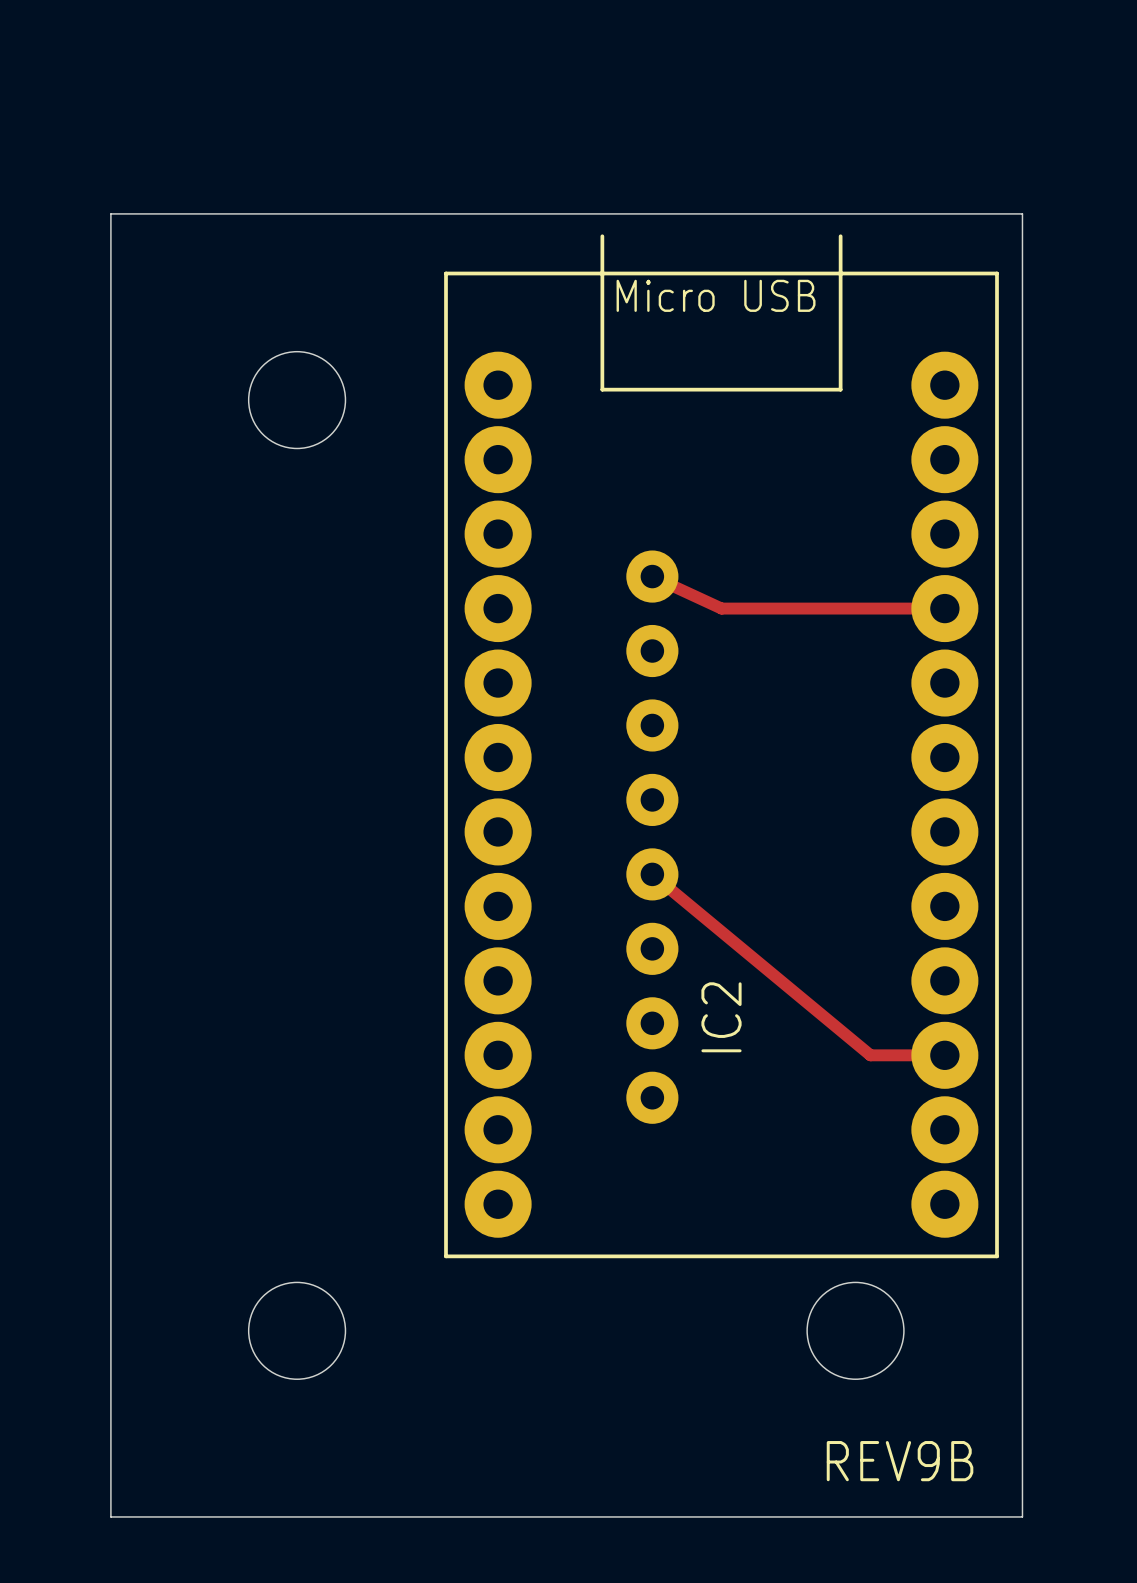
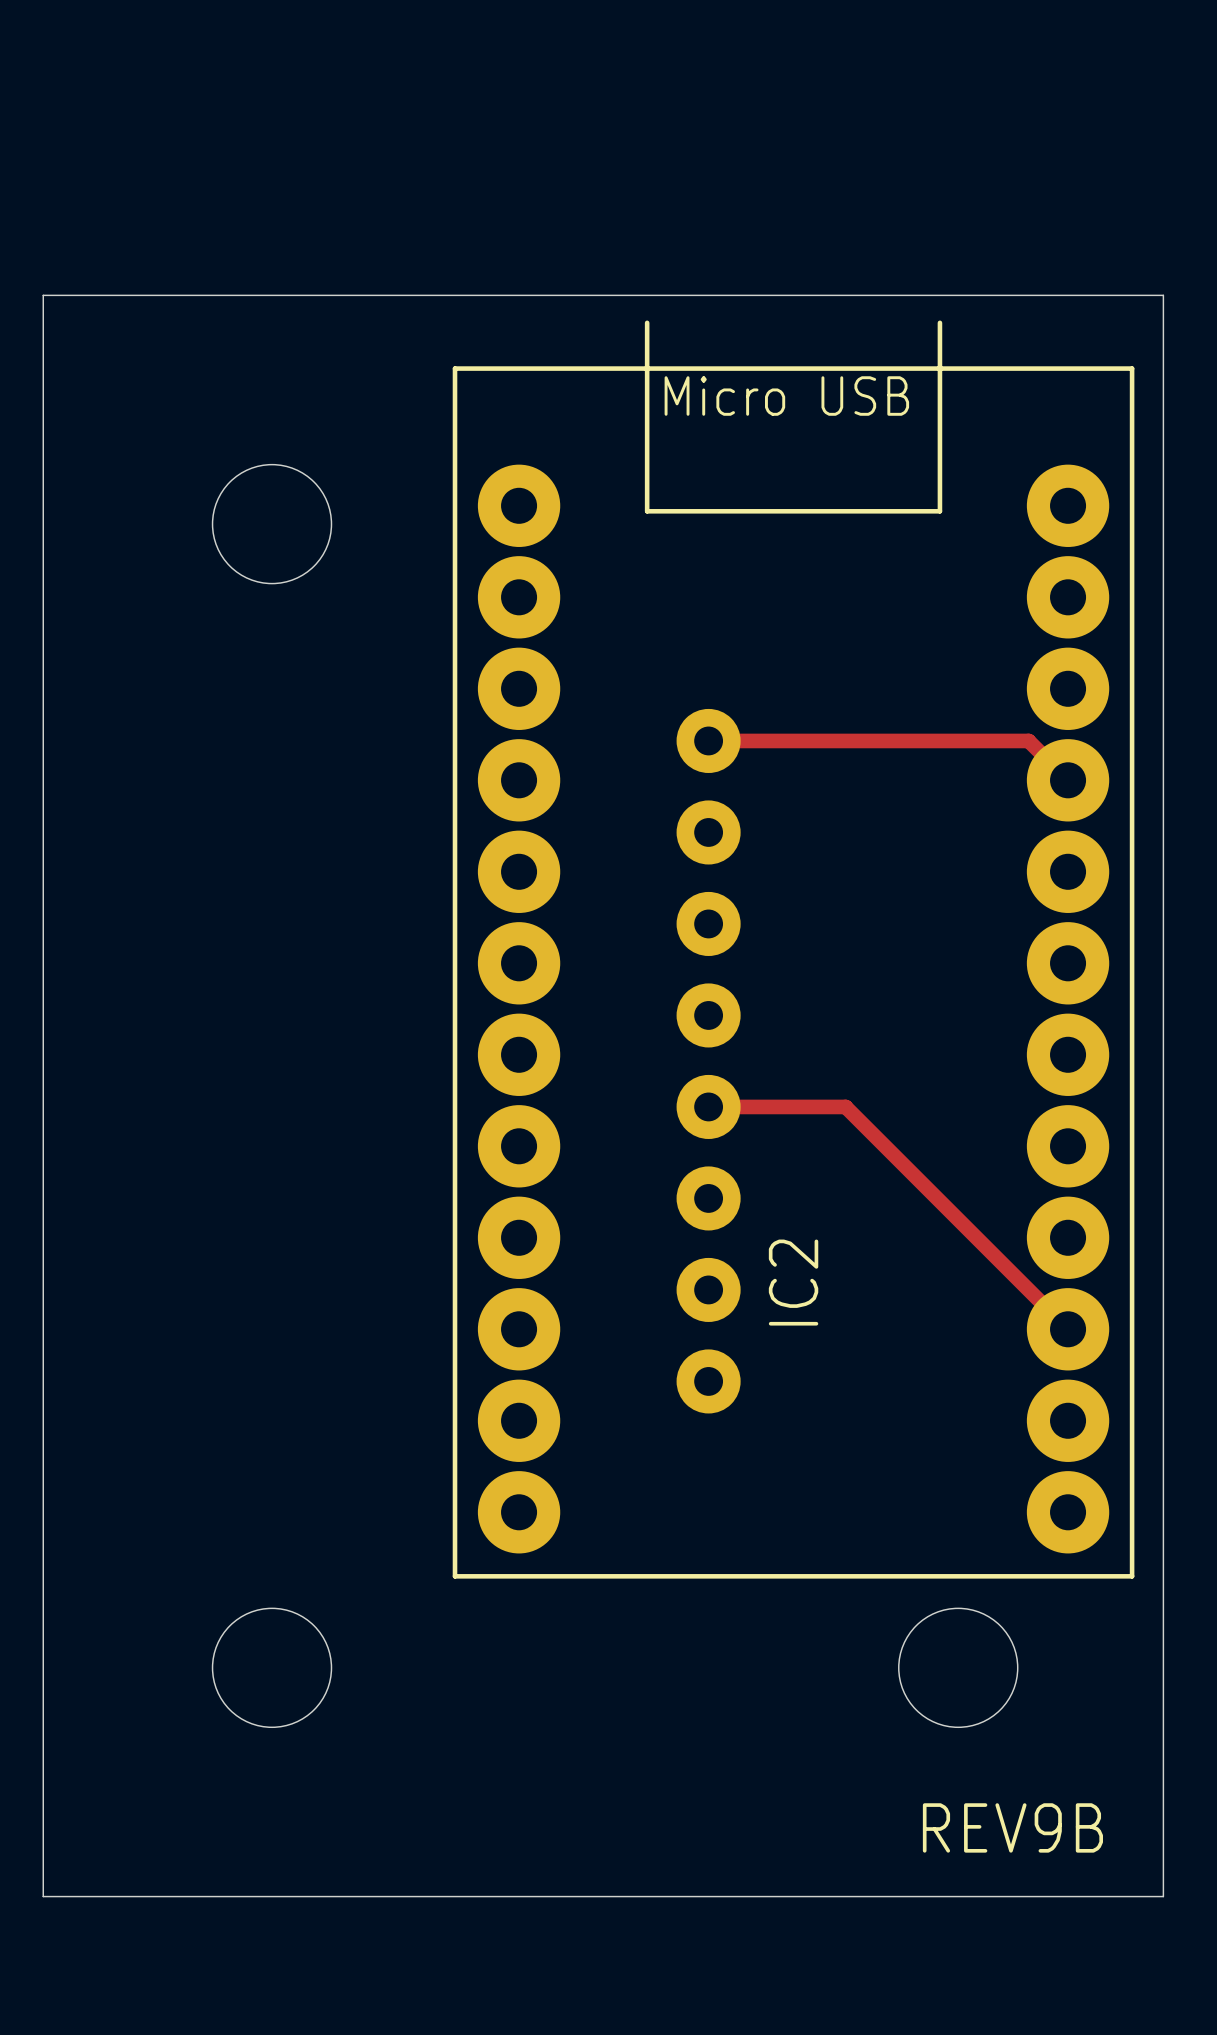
track: (652, 576) (721, 608) (944, 608) -> (708, 740) (1028, 740) (1068, 780)
track: (652, 874) (870, 1055) (944, 1055) -> (708, 1106) (845, 1106) (1068, 1329)

